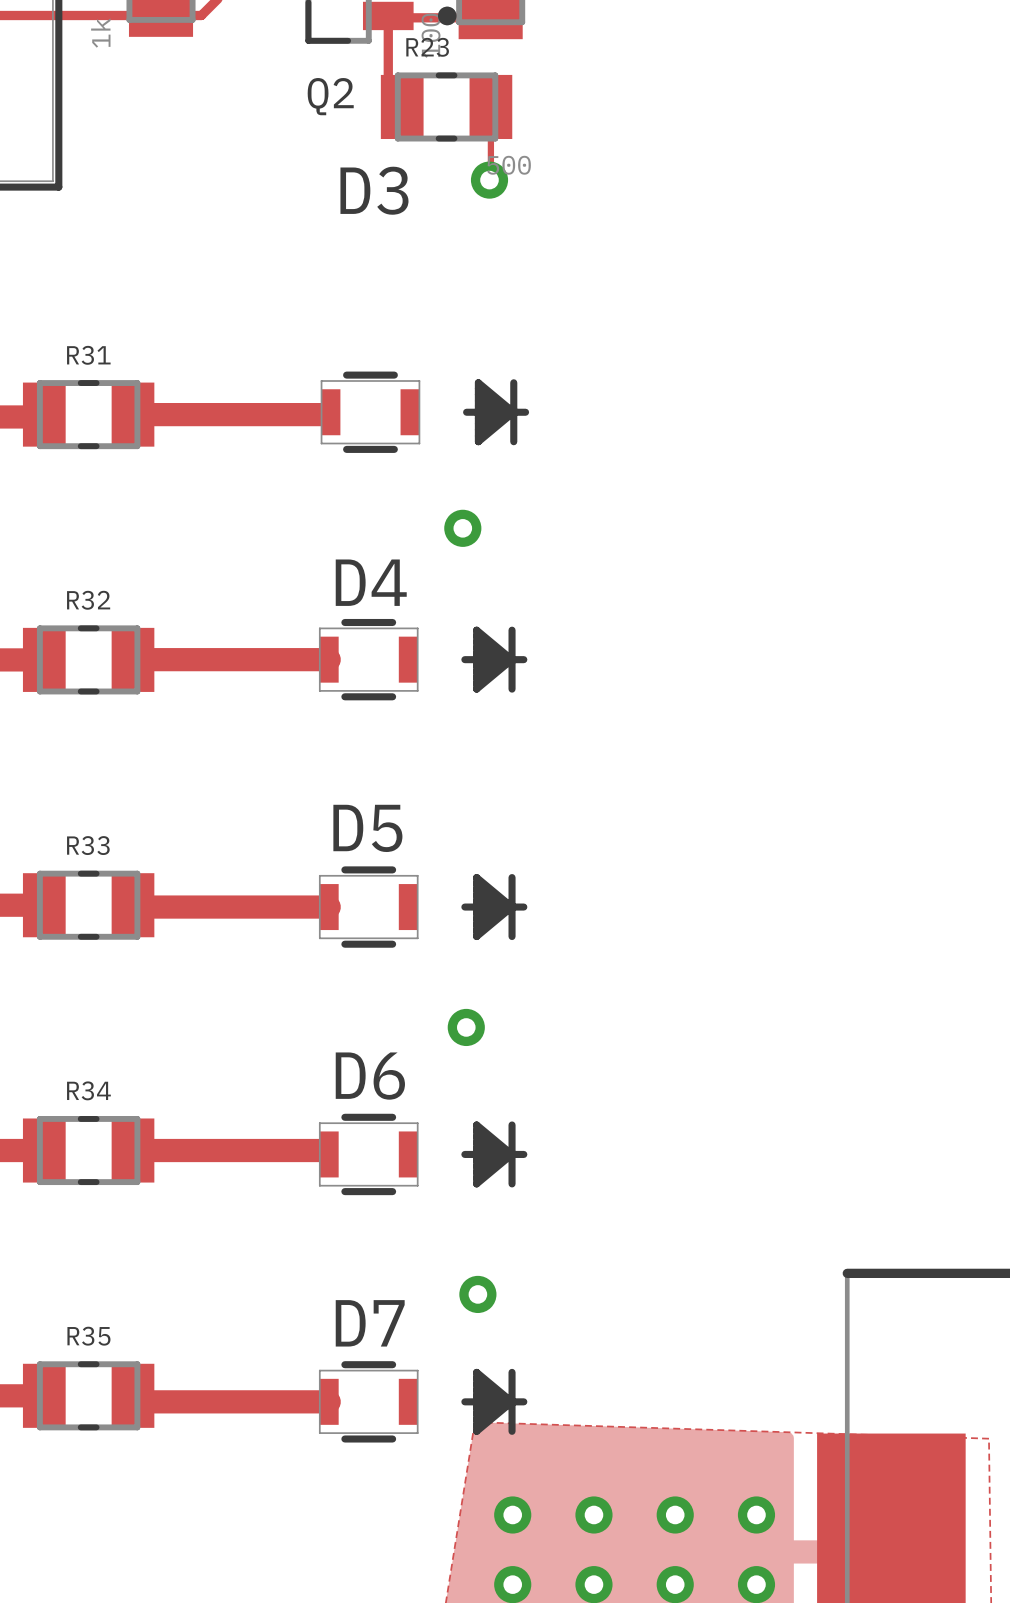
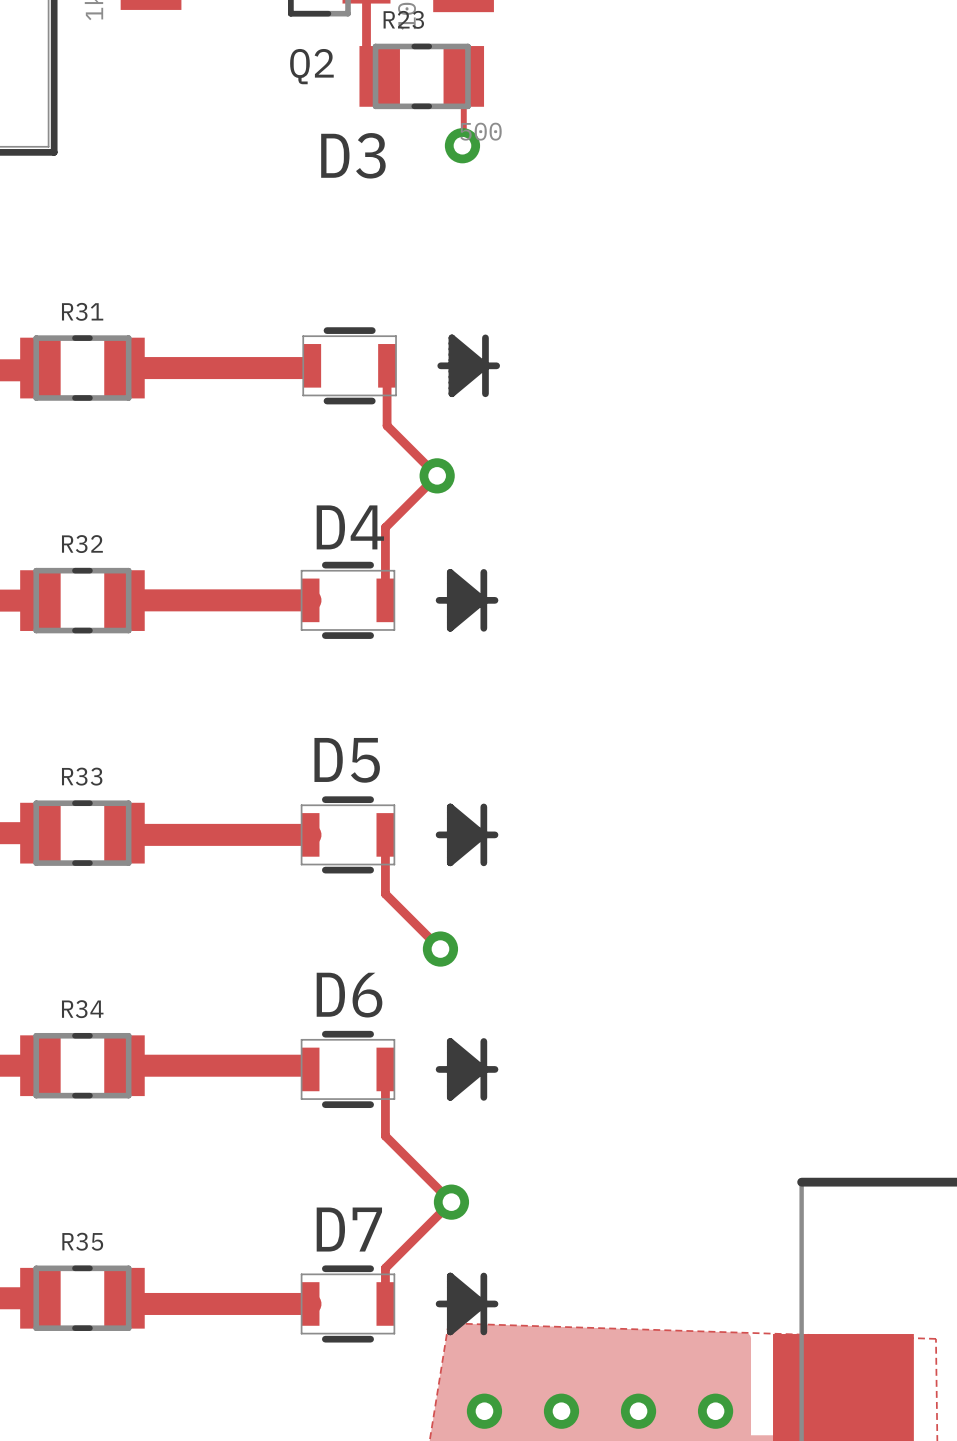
track: none -> (387, 365) (387, 425) (437, 475) (385, 527) (385, 600)
track: none -> (385, 834) (385, 894) (440, 949)
track: none -> (385, 1069) (385, 1136) (451, 1202) (385, 1268) (385, 1303)

